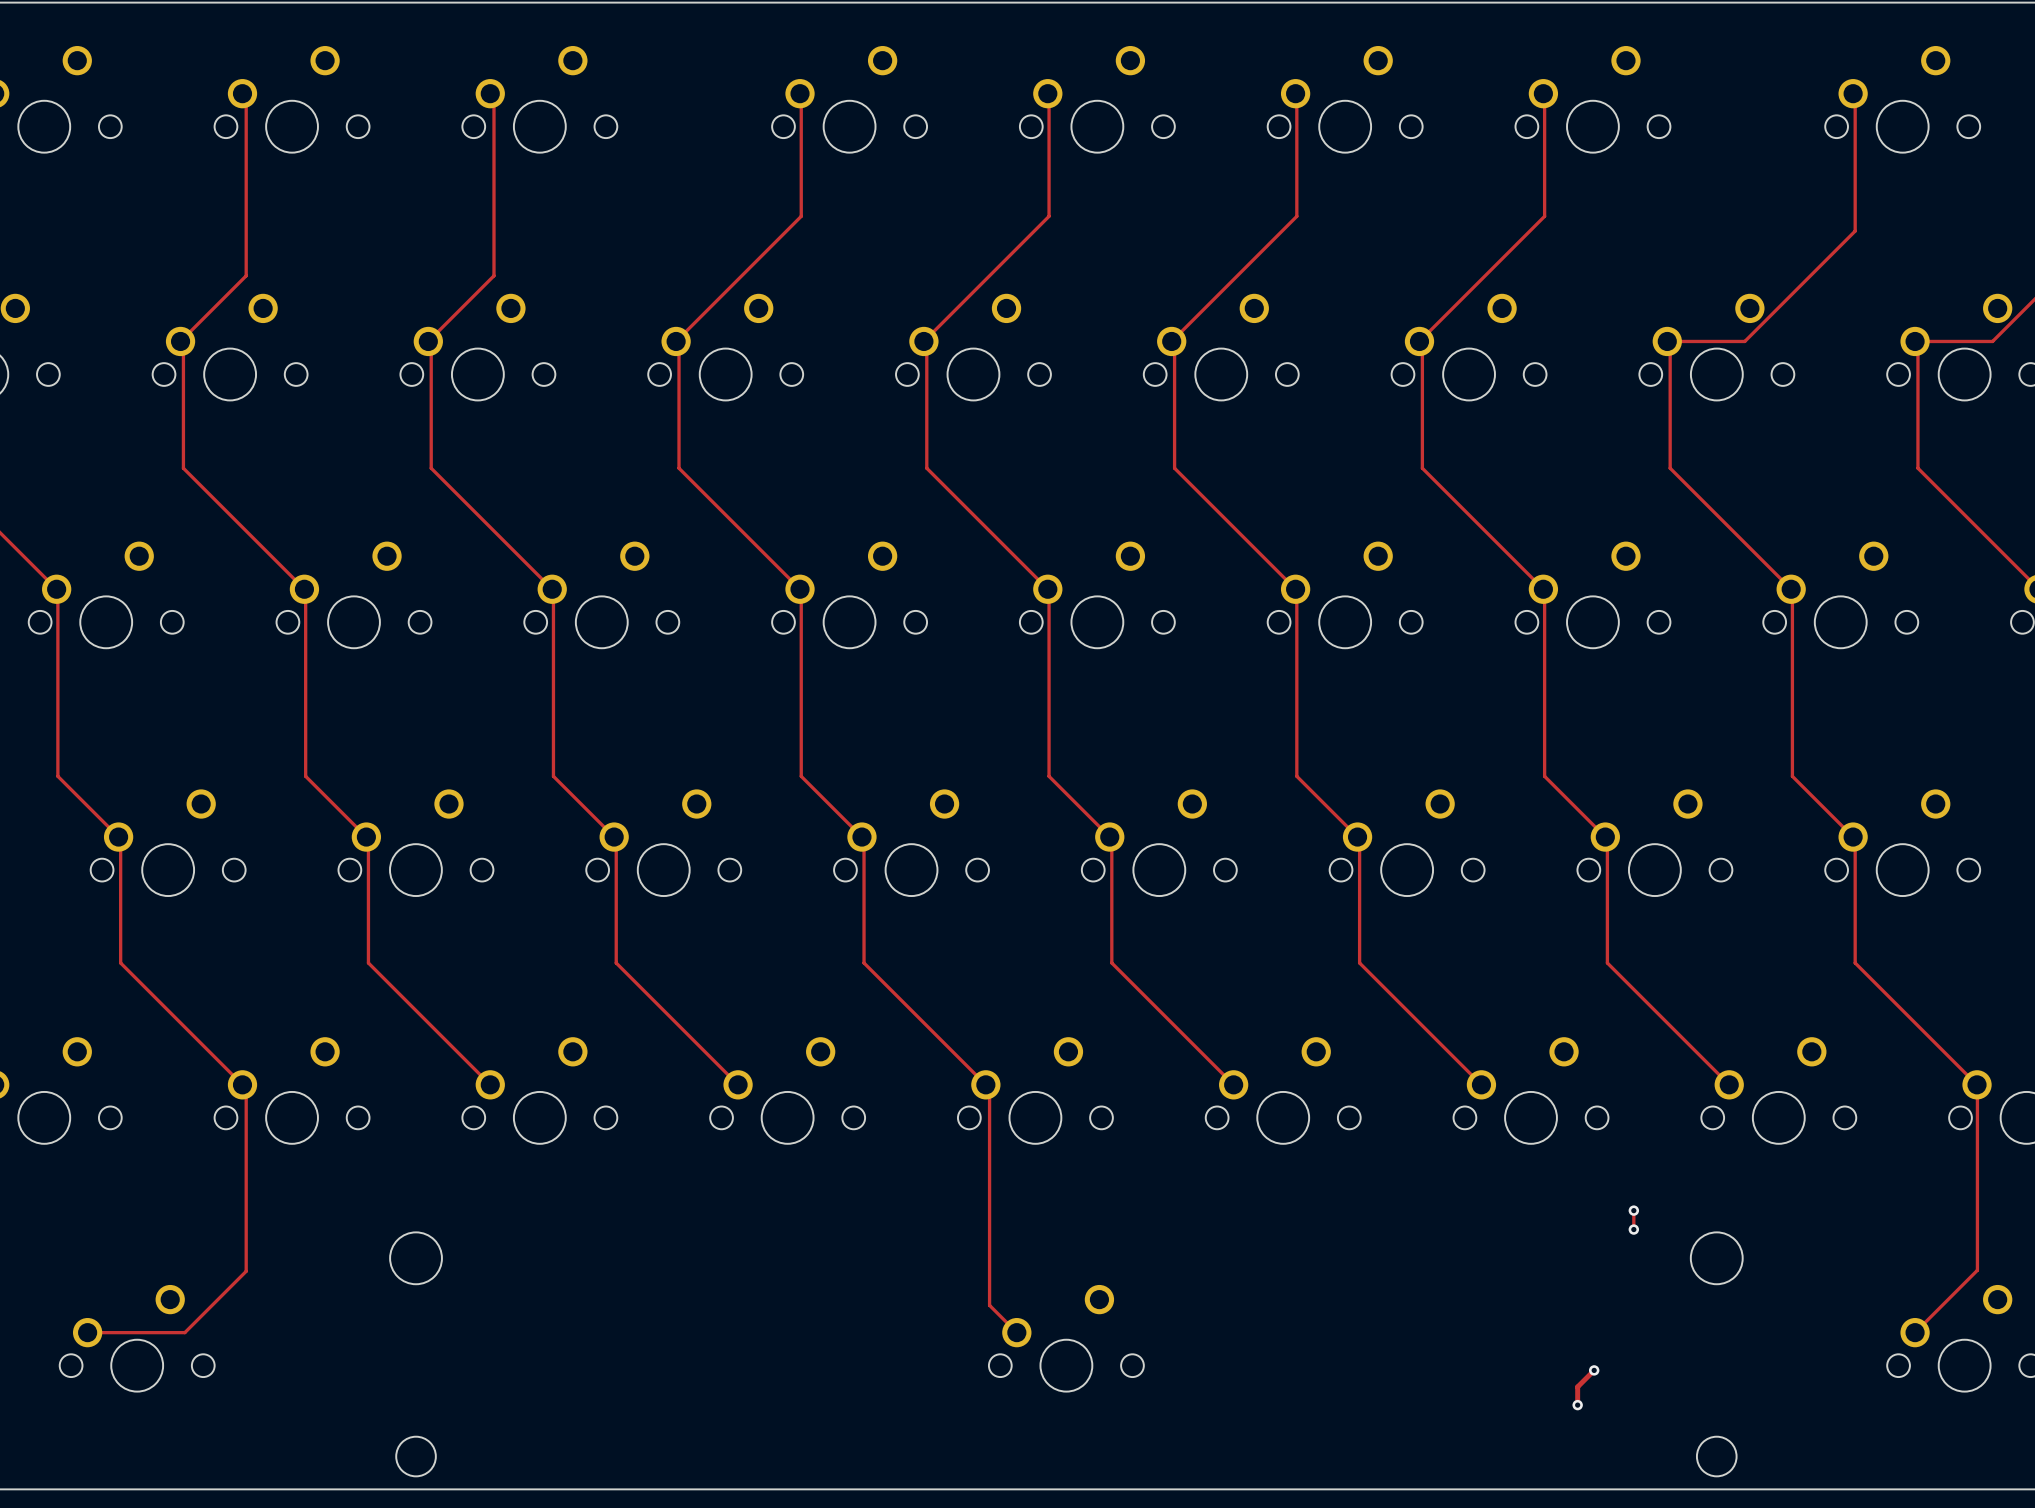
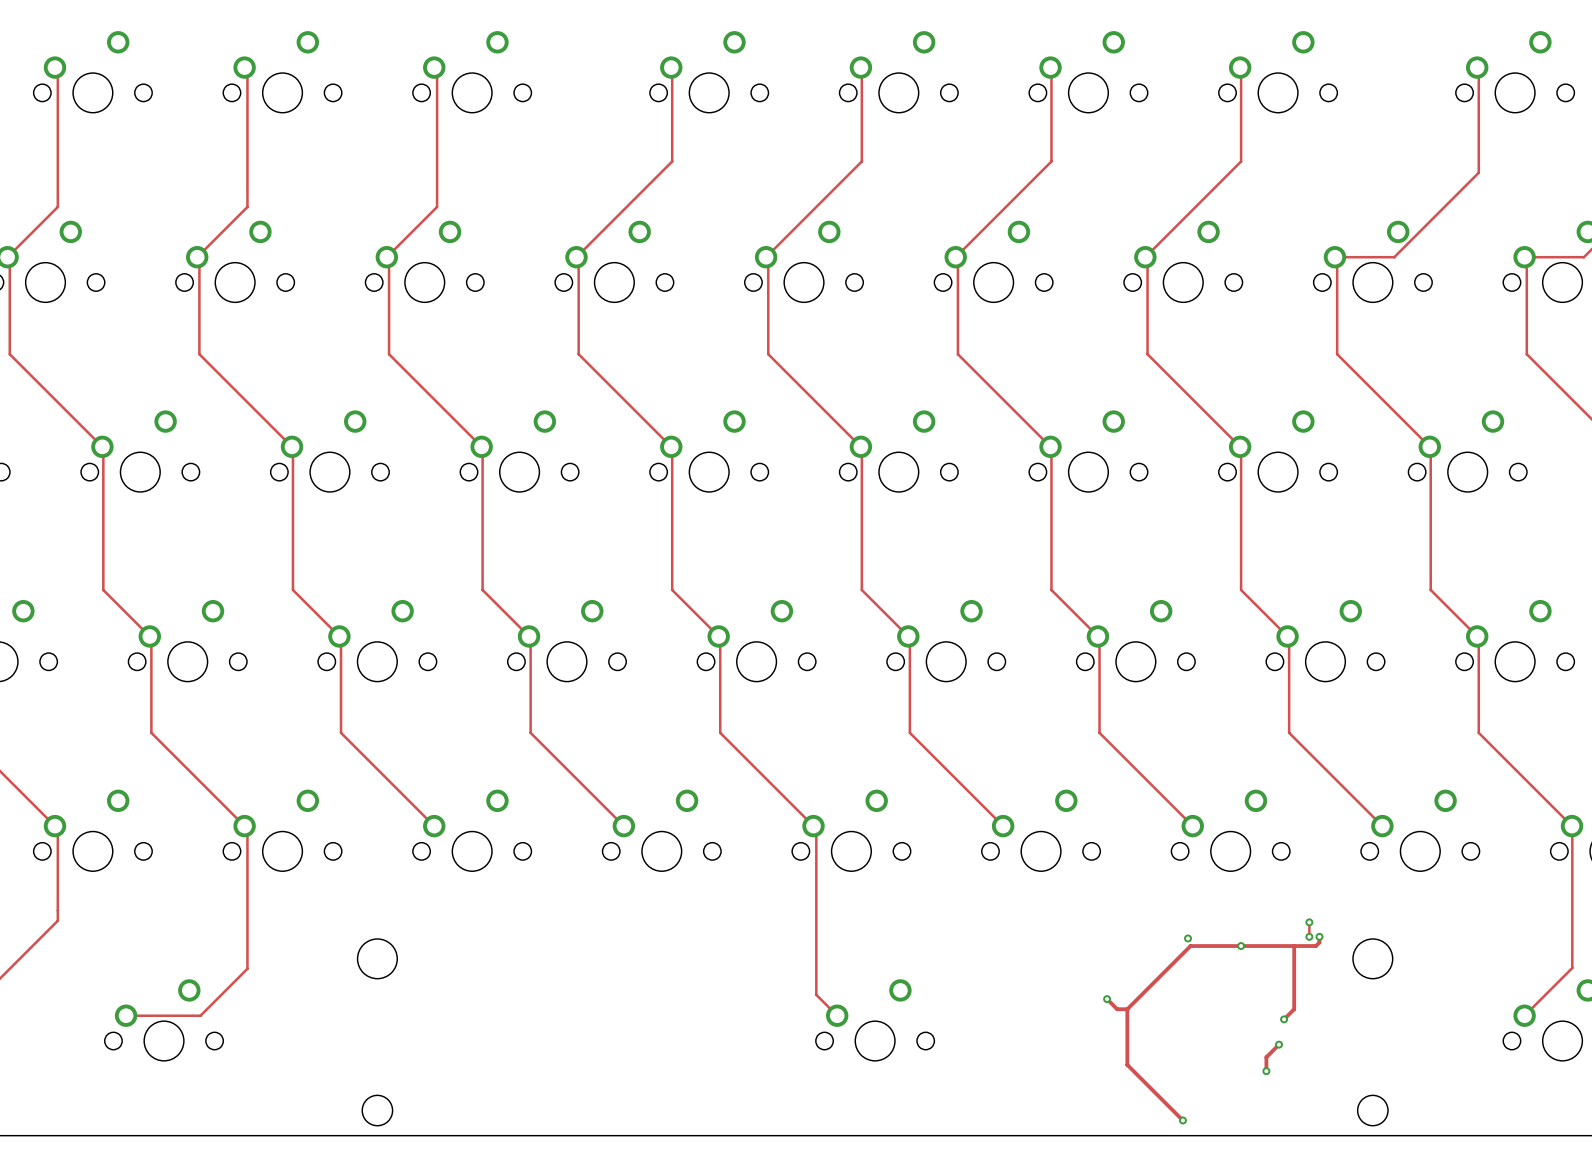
track: none -> (1319, 936) (1319, 942) (1315, 946) (1190, 946) (1127, 1009)
via: none -> (1319, 936)
via: none -> (1188, 938)
via: none -> (1241, 946)
track: none -> (1294, 946) (1294, 1009) (1284, 1019)
track: none -> (1107, 999) (1117, 1009) (1127, 1009)
via: none -> (1107, 999)
track: none -> (1127, 1009) (1127, 1064) (1182, 1120)
via: none -> (1284, 1019)
via: none -> (1182, 1120)

